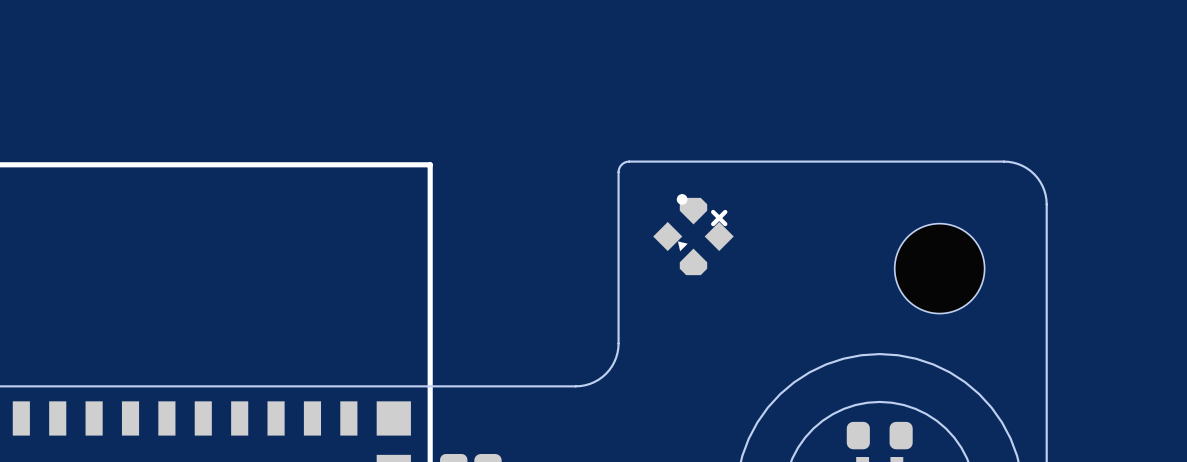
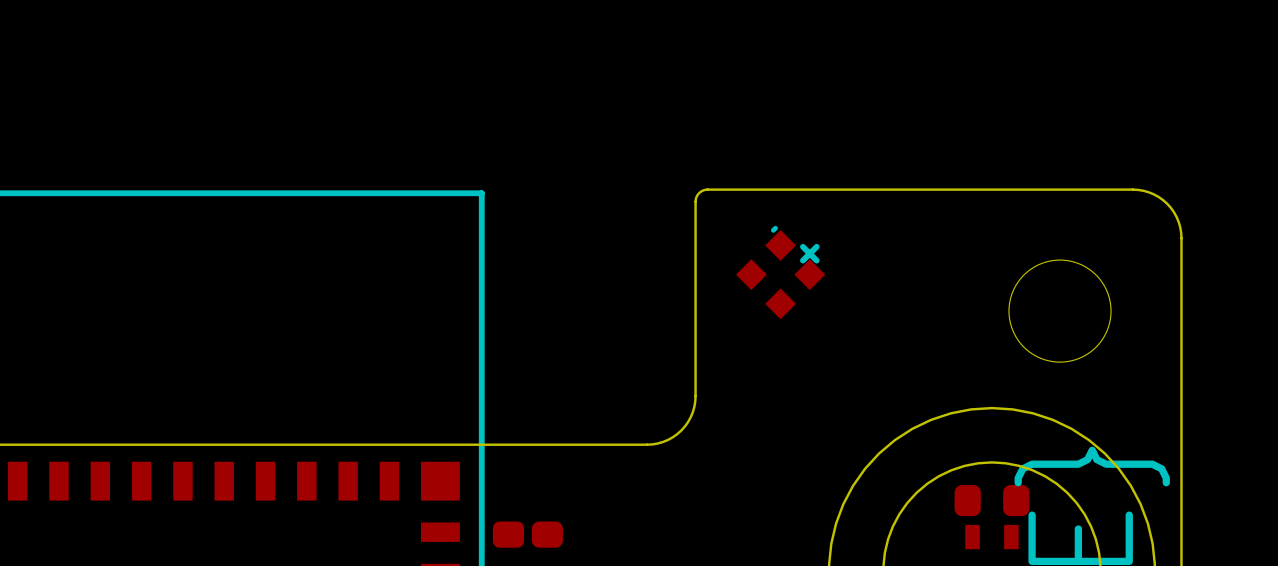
part footprint: [653, 194, 734, 276] -> [735, 225, 826, 320]

